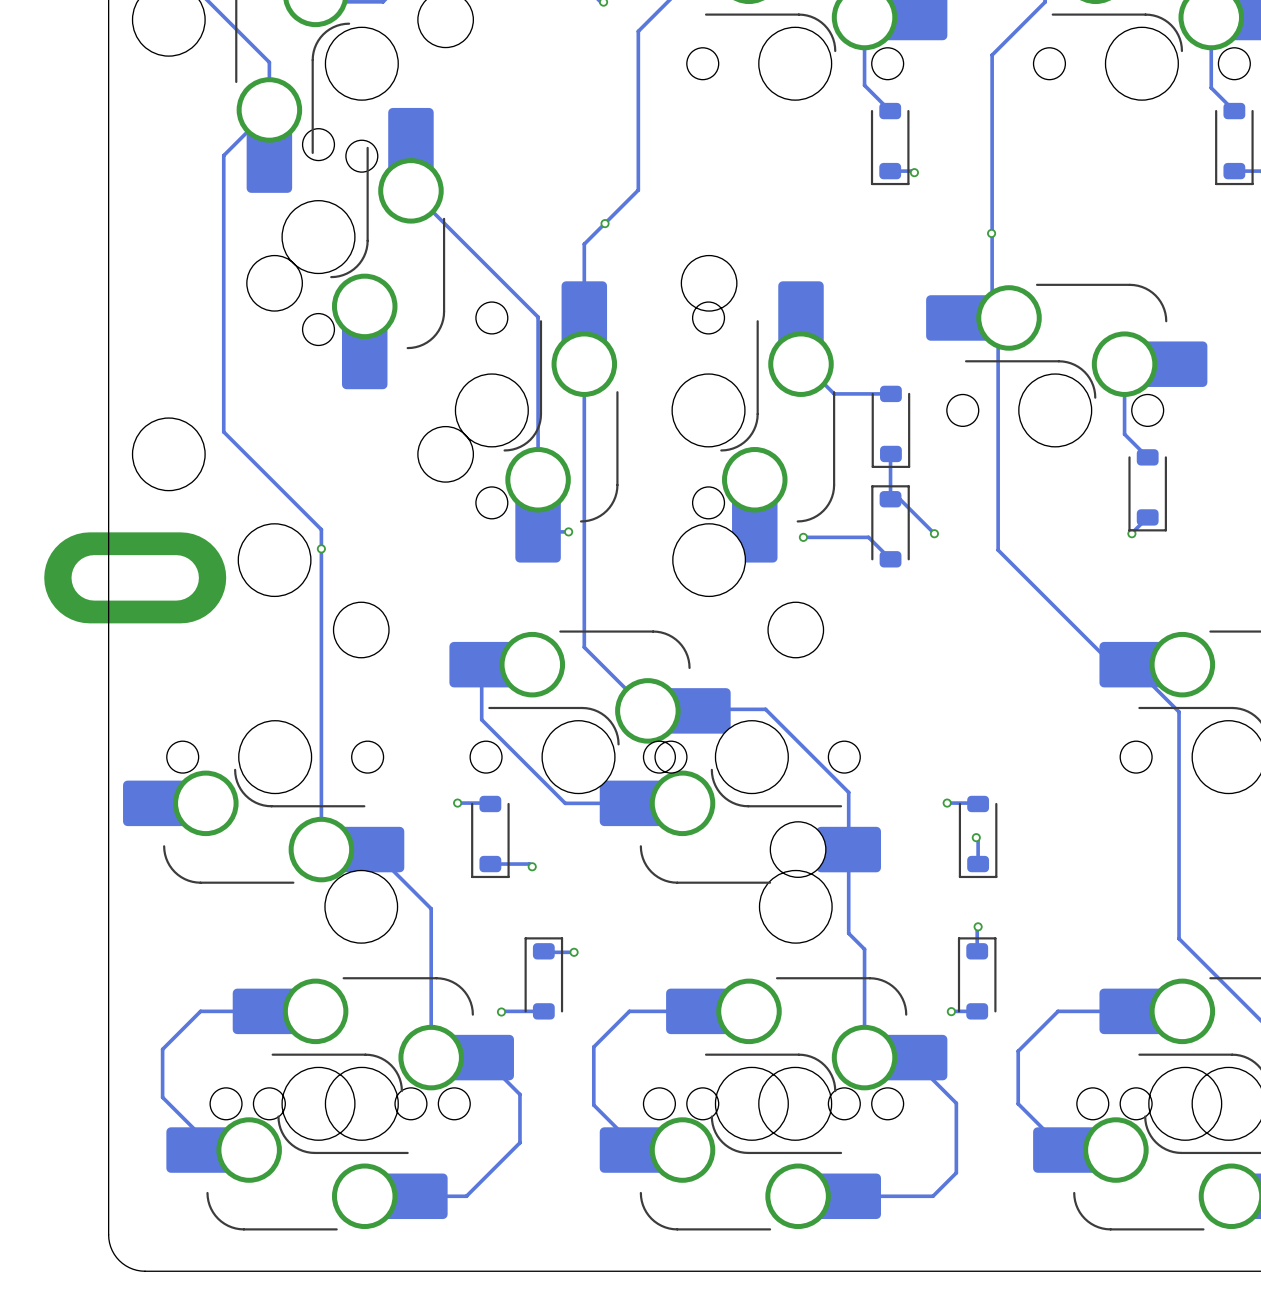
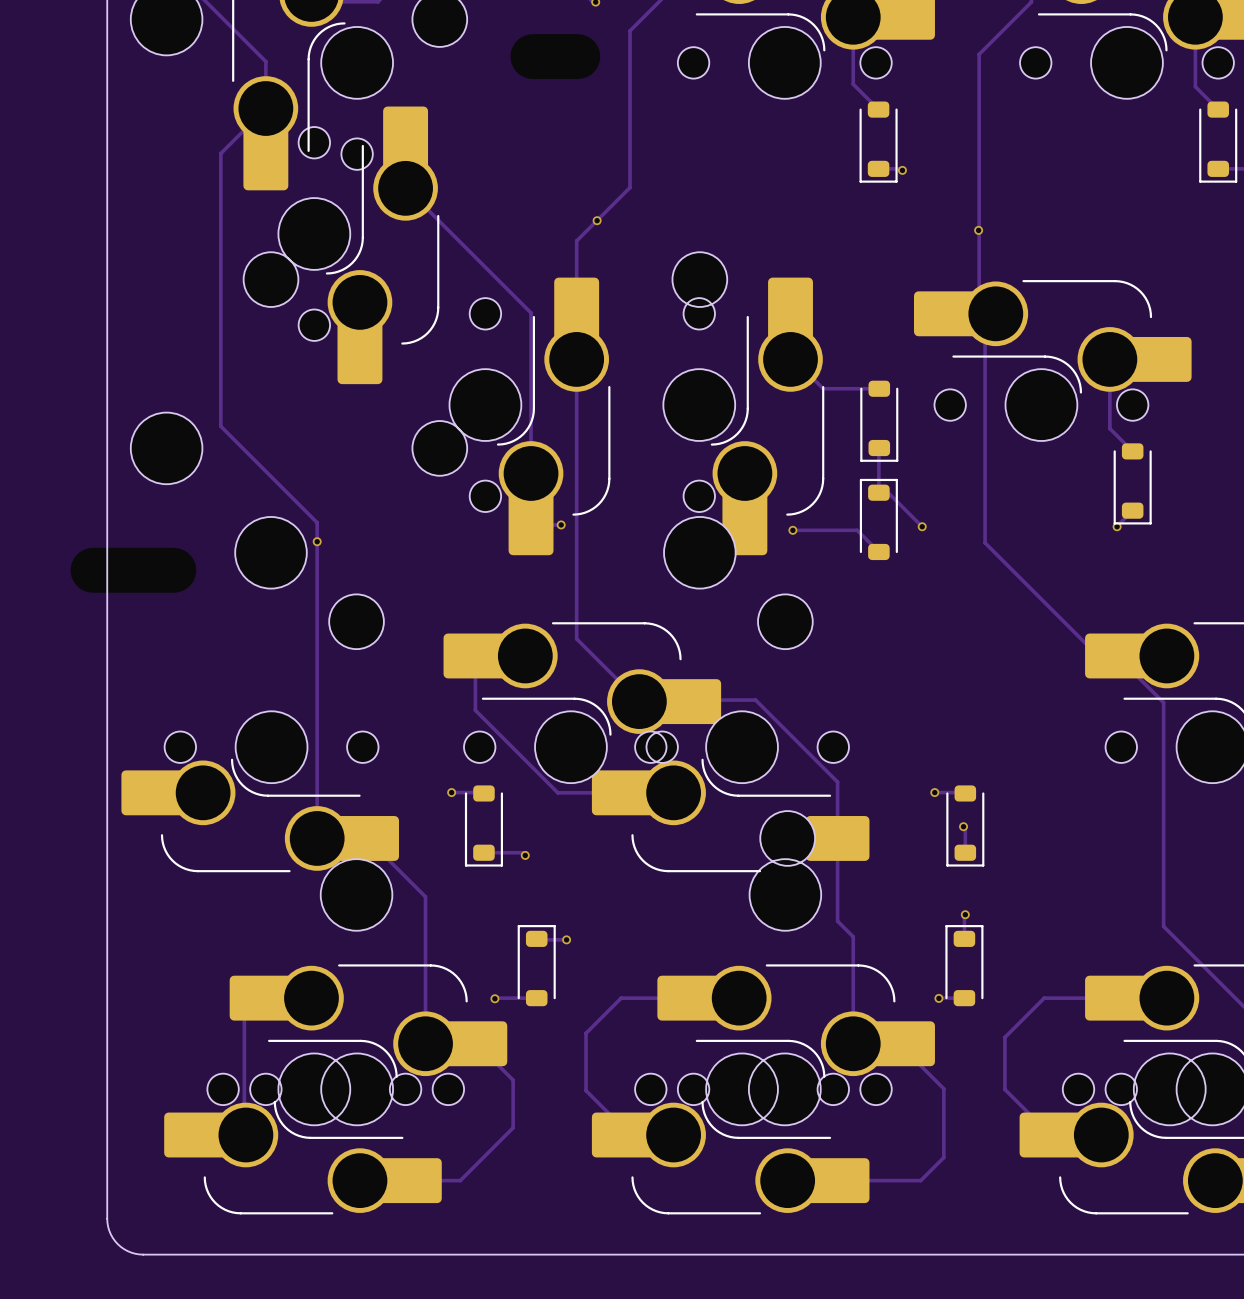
part footprint: [44, 532, 227, 624] -> [70, 547, 197, 593]
track: (315, 1011) (200, 1011) (162, 1049) (162, 1097) (215, 1150) (249, 1150) -> none
track: none -> (244, 1015) (244, 1133)

